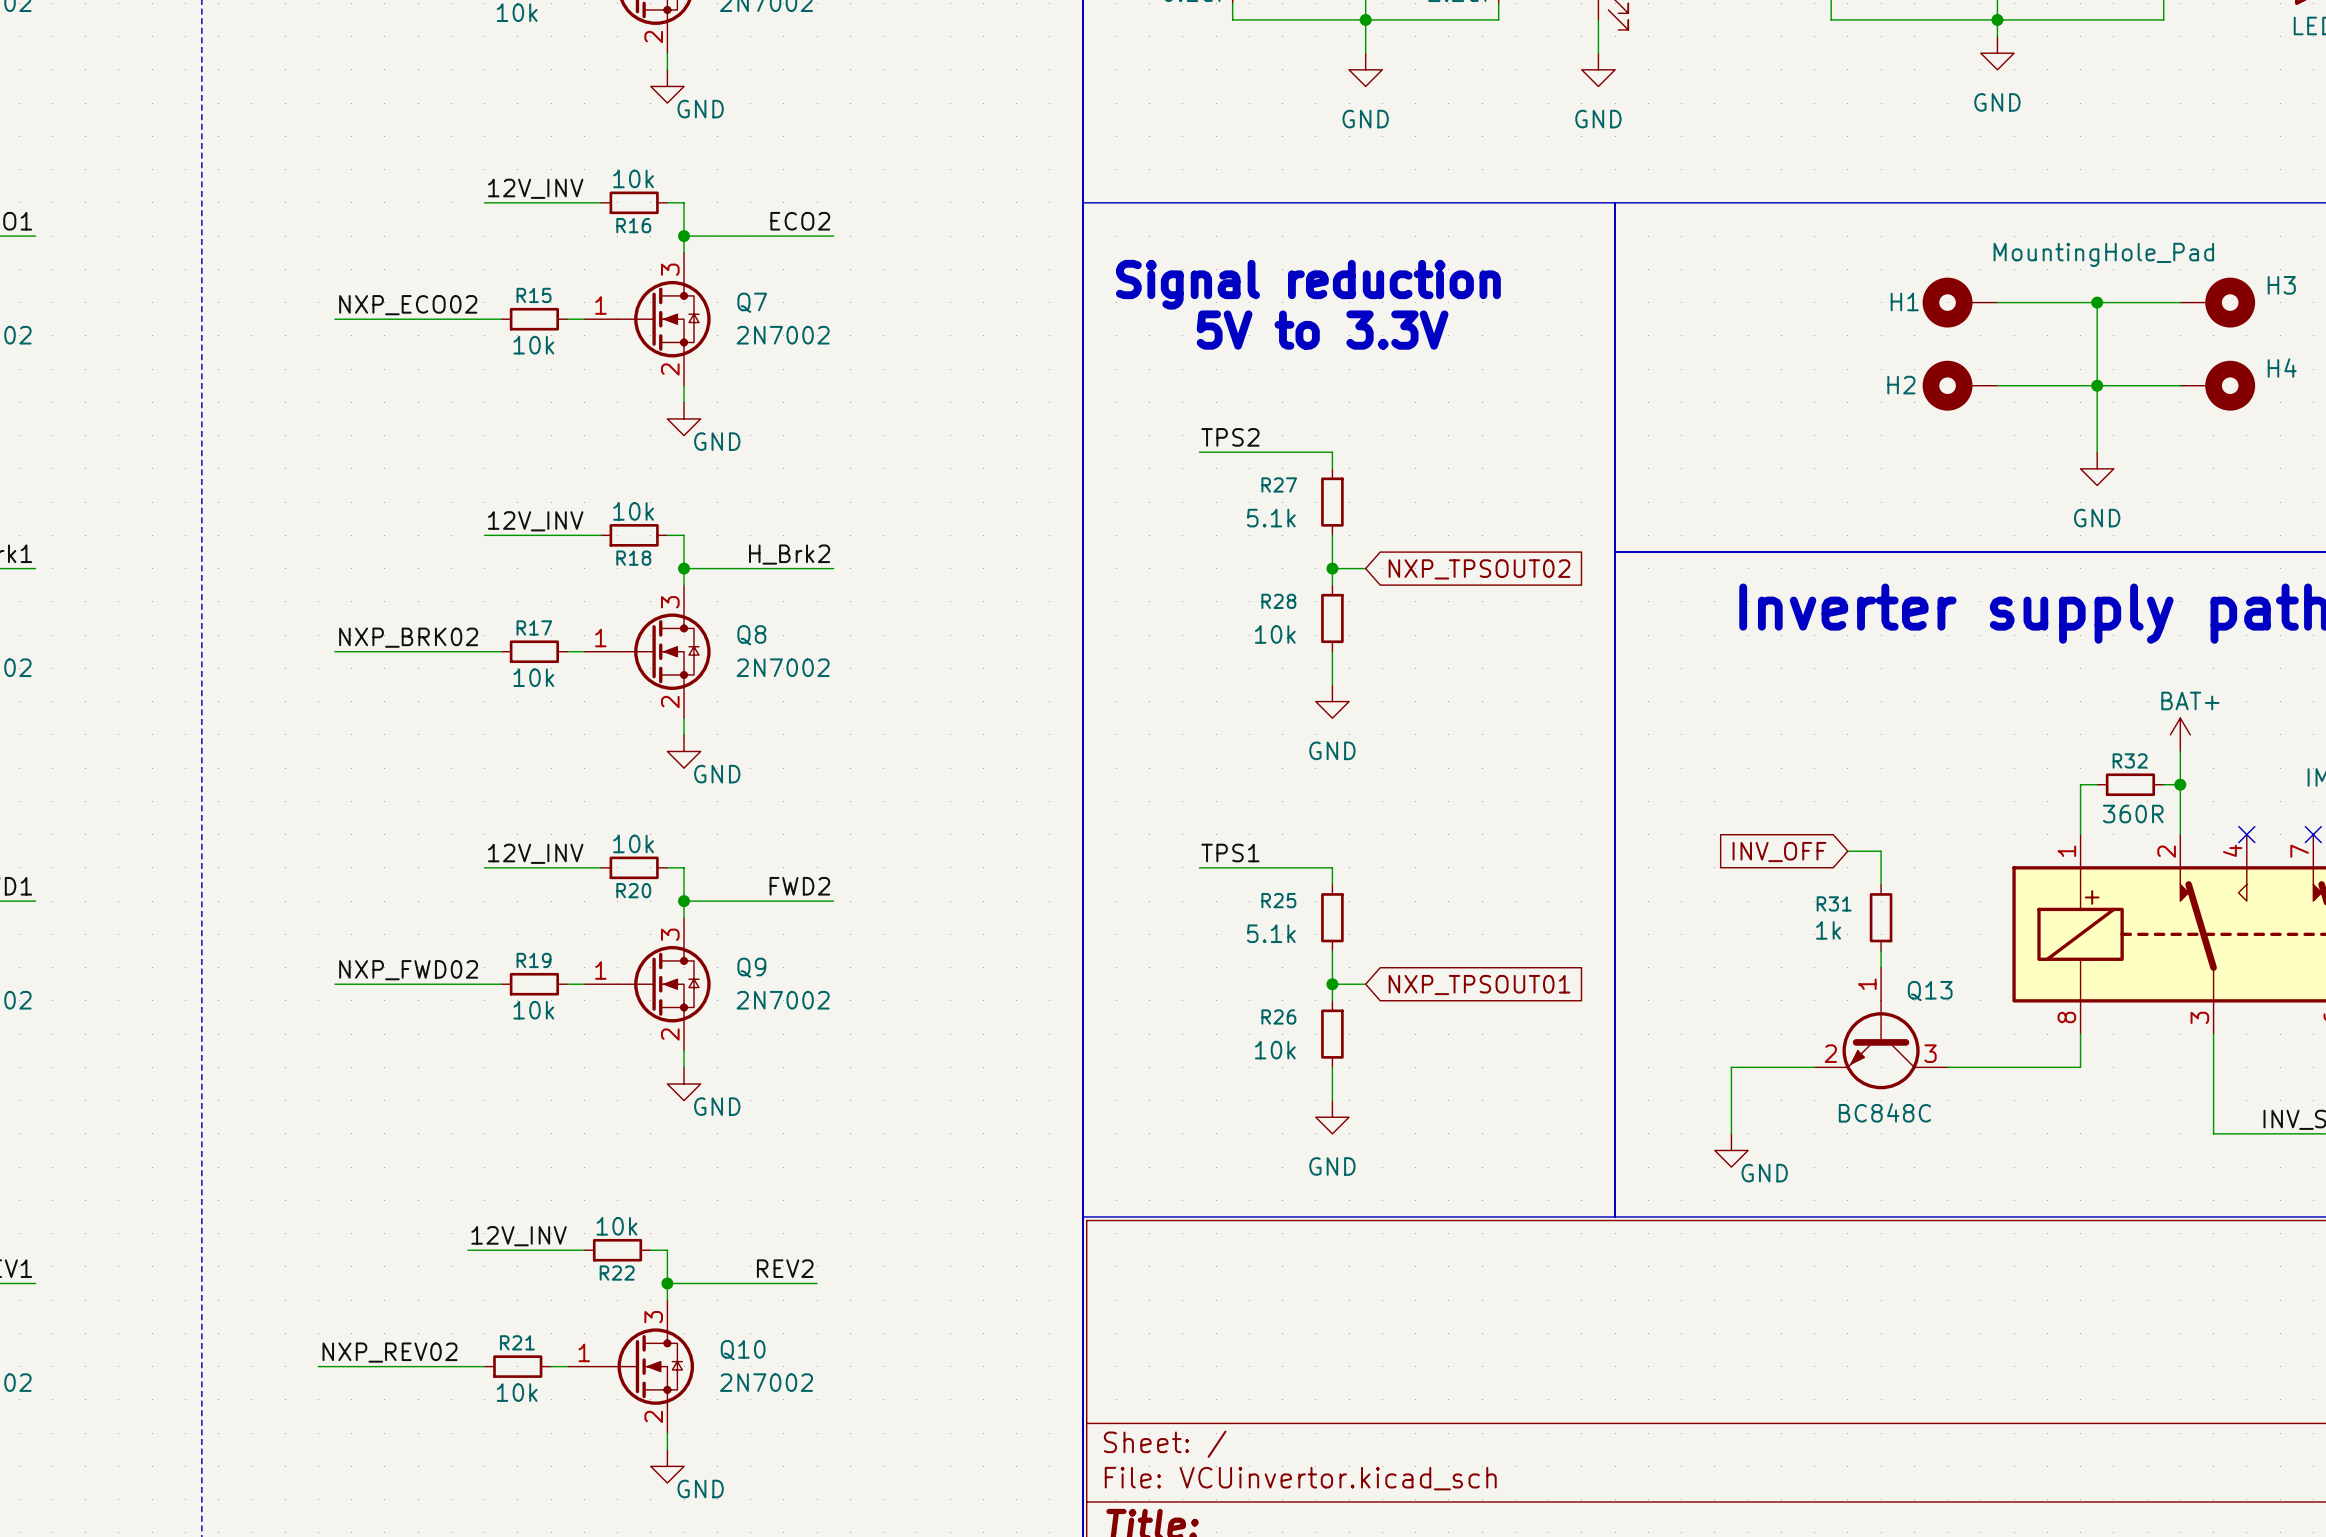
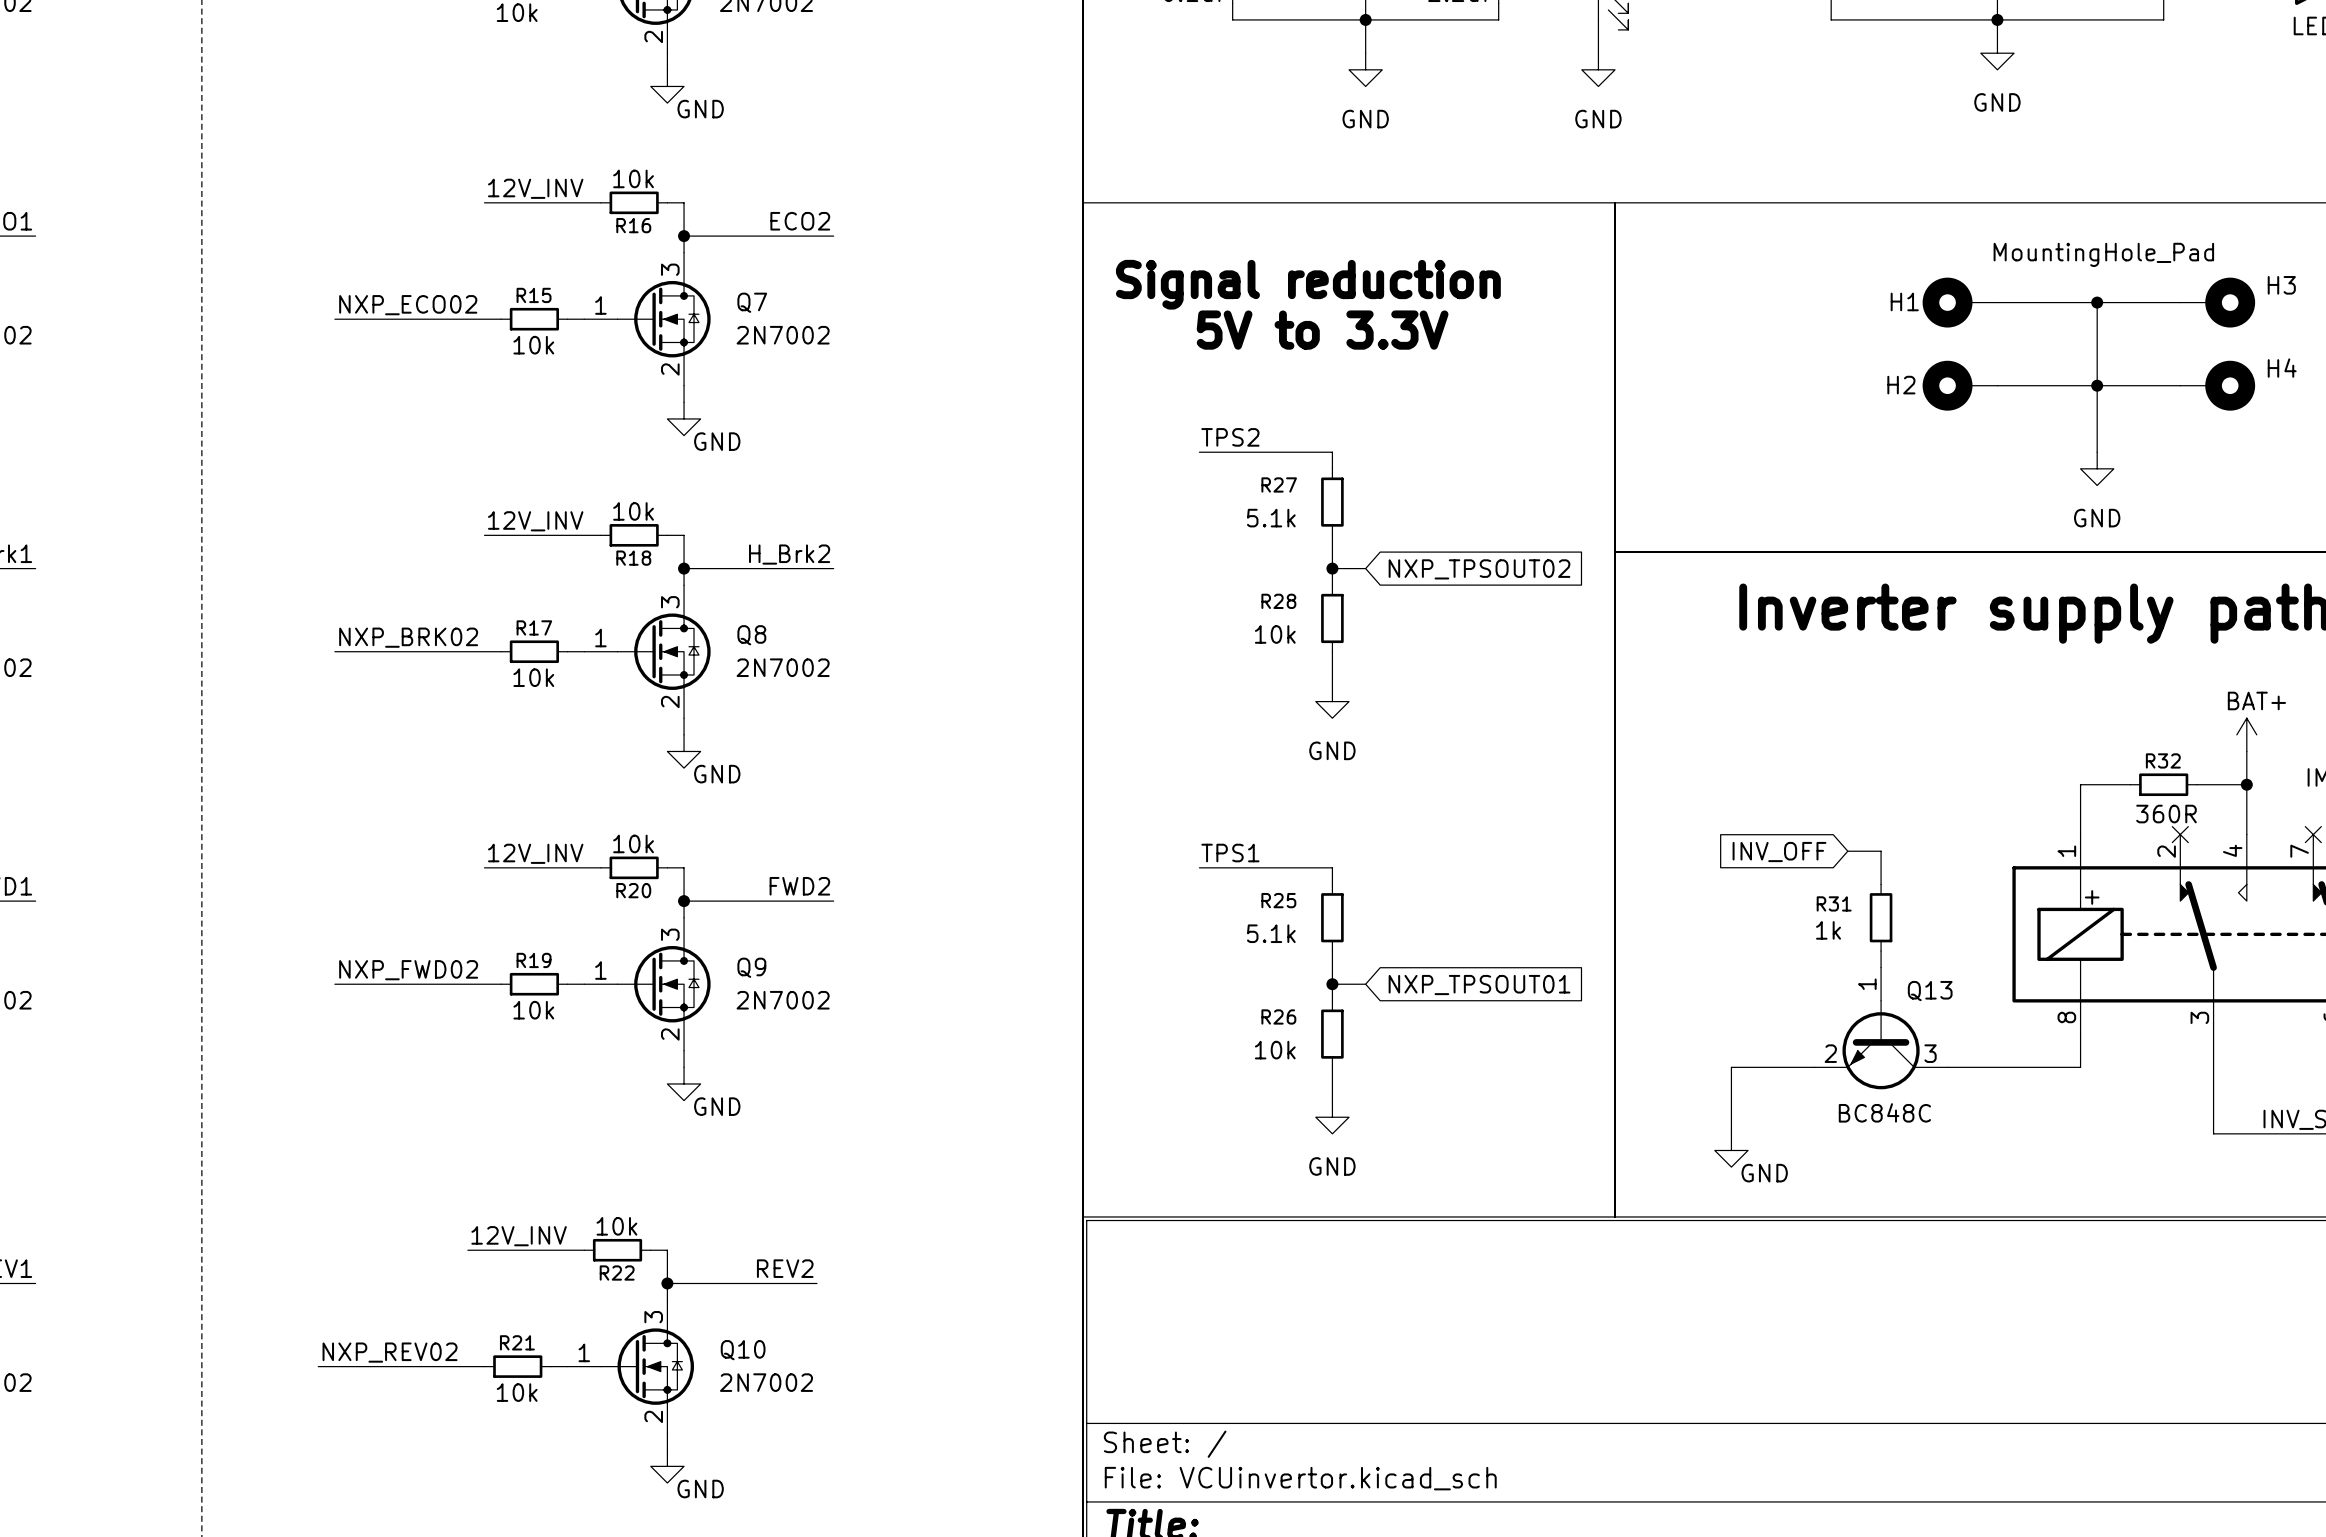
power symbol position: BAT+ (2180, 734) -> BAT+ (2246, 734)
wire: (2180, 751) (2180, 834) -> (2246, 751) (2246, 834)
wire: none -> (2097, 784) (2130, 784)
R32 position: (2130, 784) -> (2163, 784)
wire: (2163, 784) (2180, 784) -> none
junction position: (2180, 784) -> (2246, 784)
wire: none -> (2196, 784) (2246, 784)
no-connect mark position: (2246, 834) -> (2180, 834)

